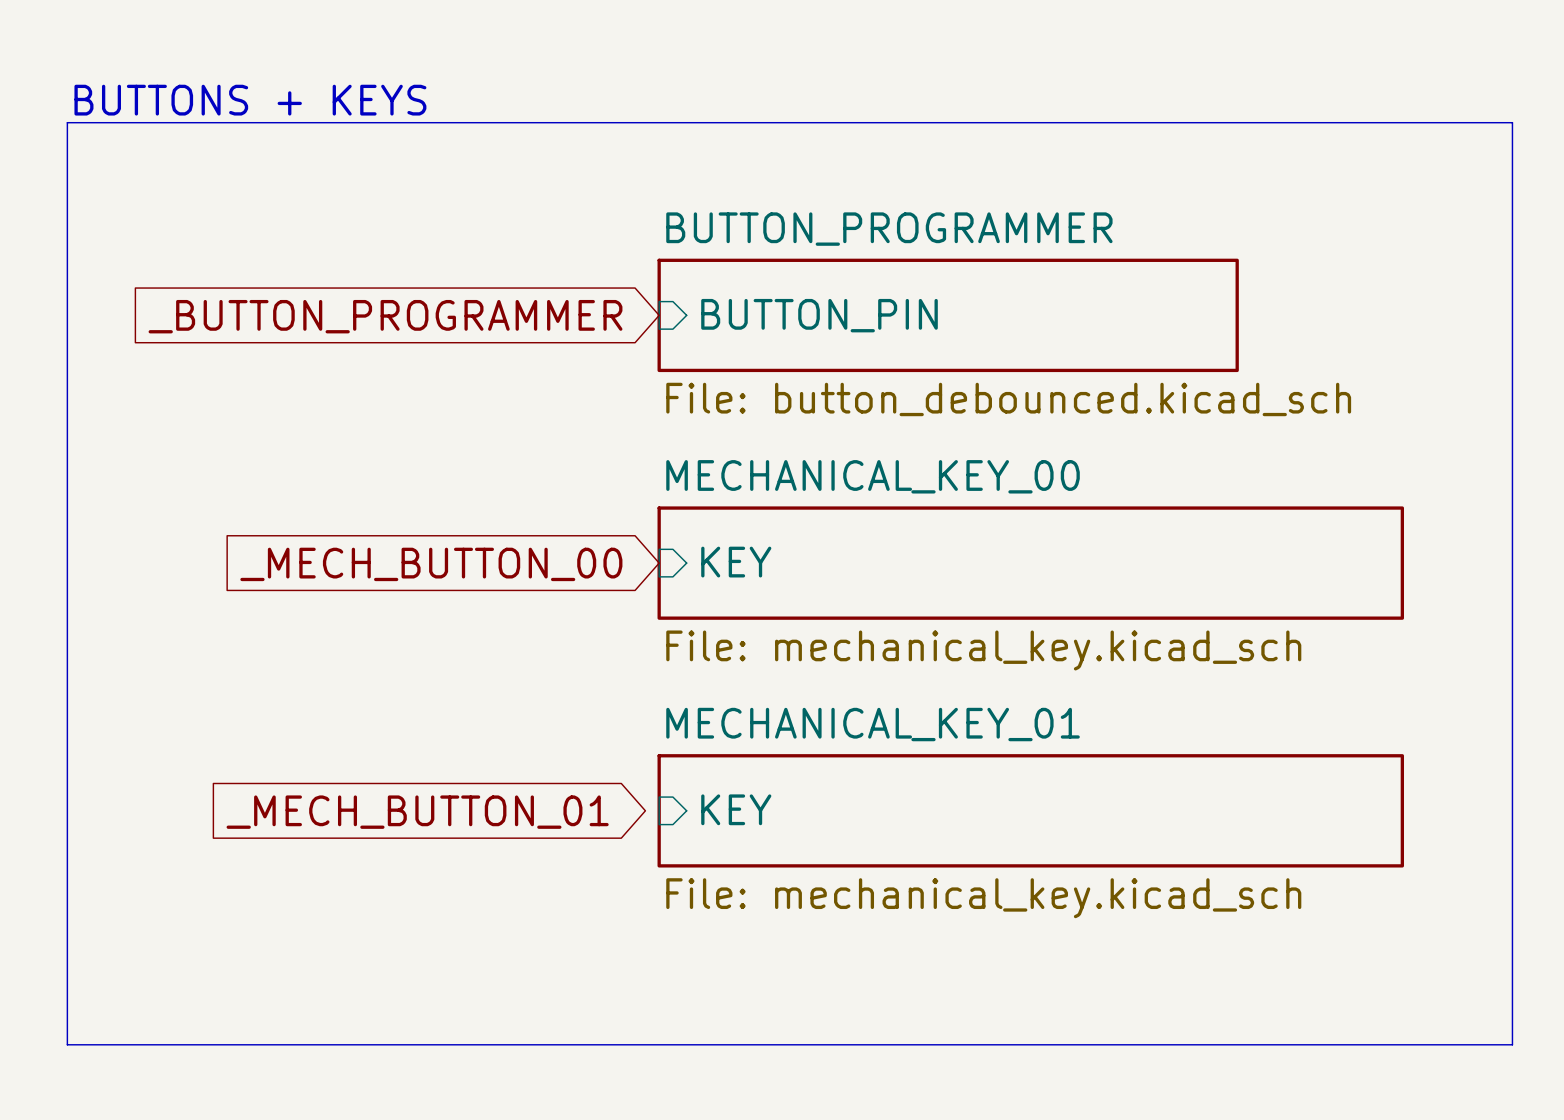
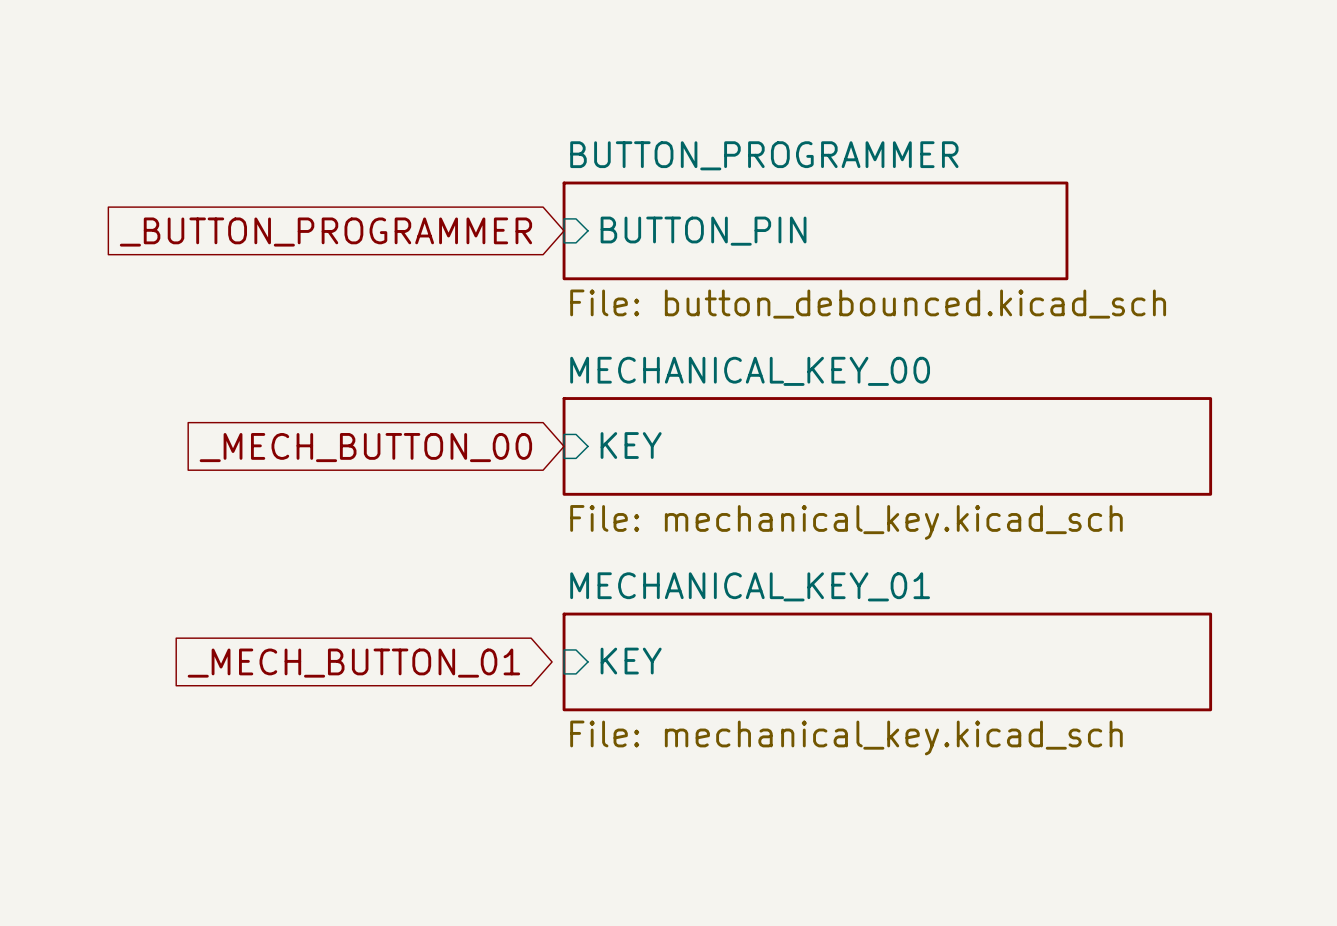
text: BUTTONS + KEYS (250, 100) -> none
line: (67, 122) (1512, 122) (1512, 1044) (67, 1044) (67, 122) -> none

